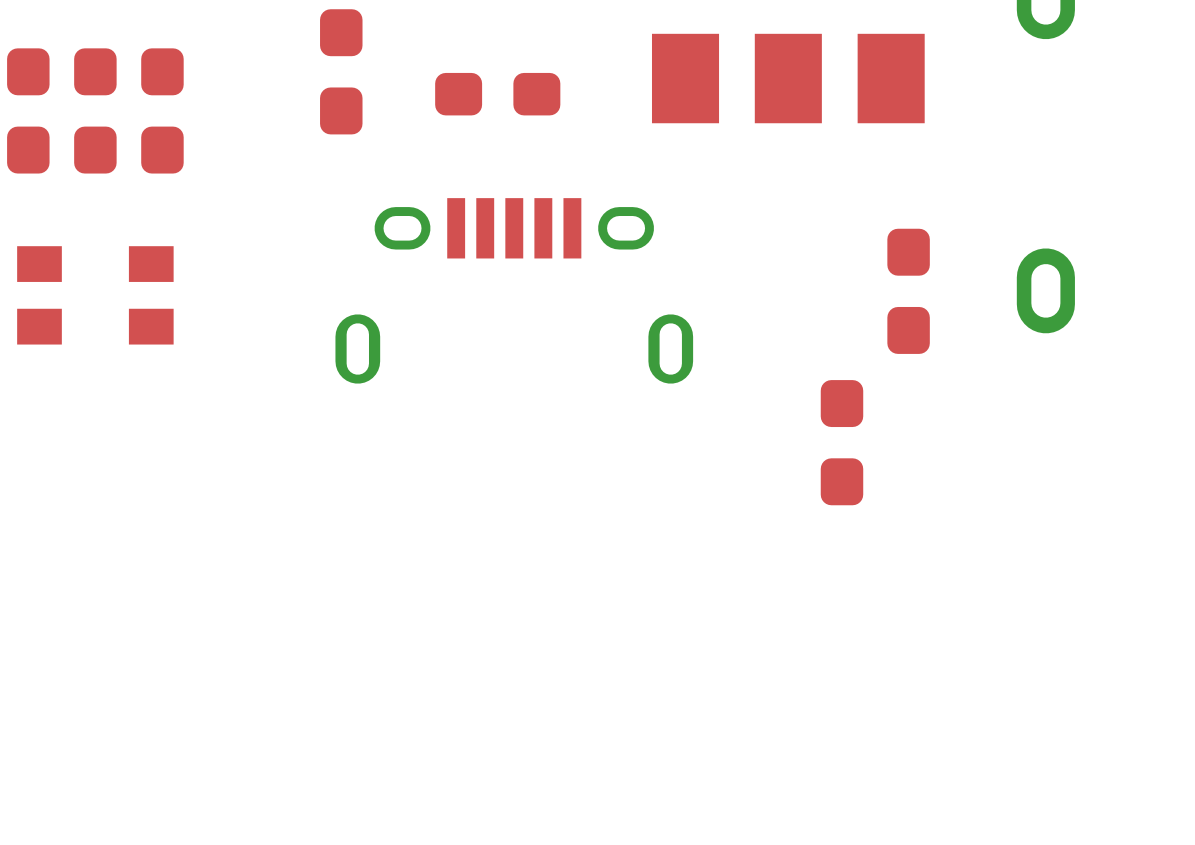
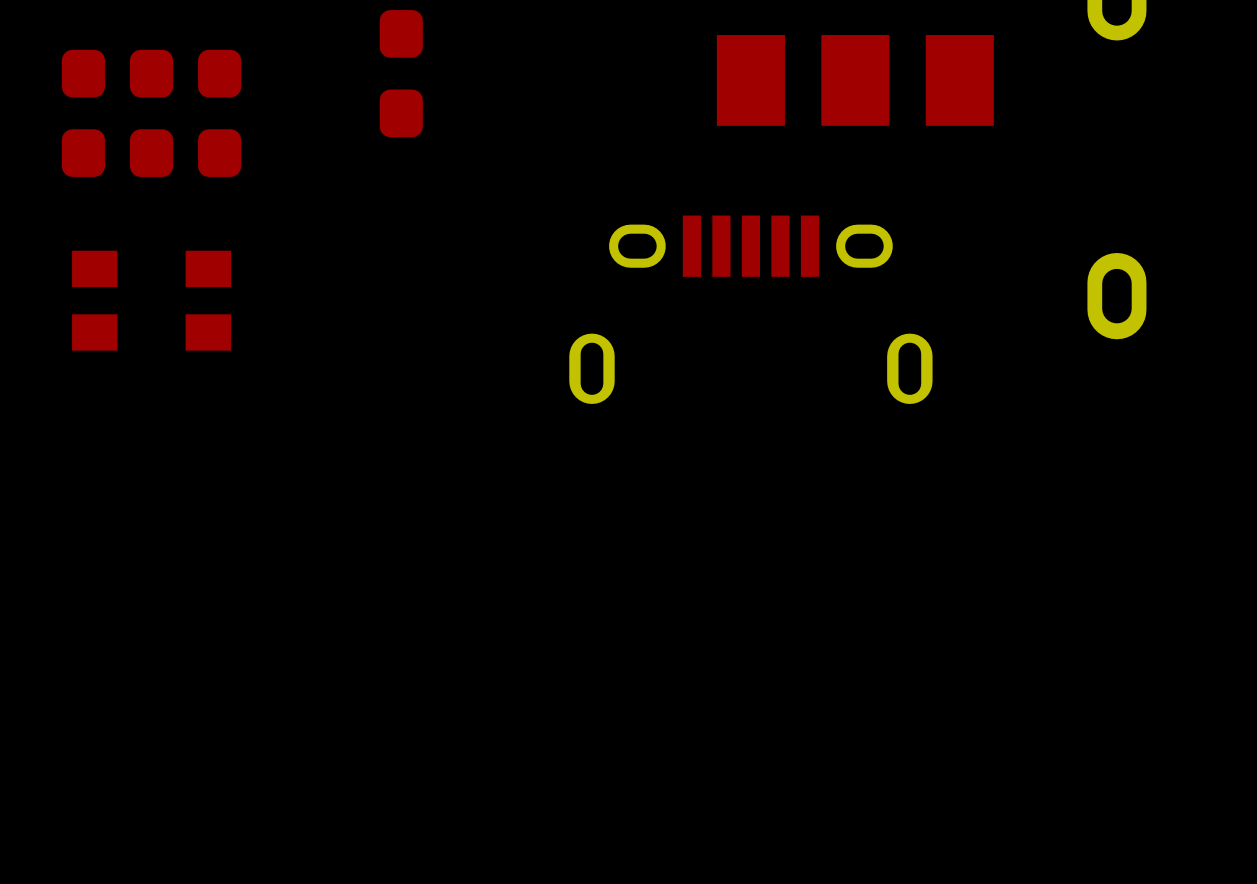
part: (497, 94) -> none
part position: (514, 290) -> (750, 309)
part: (908, 291) -> none
part: (841, 442) -> none

